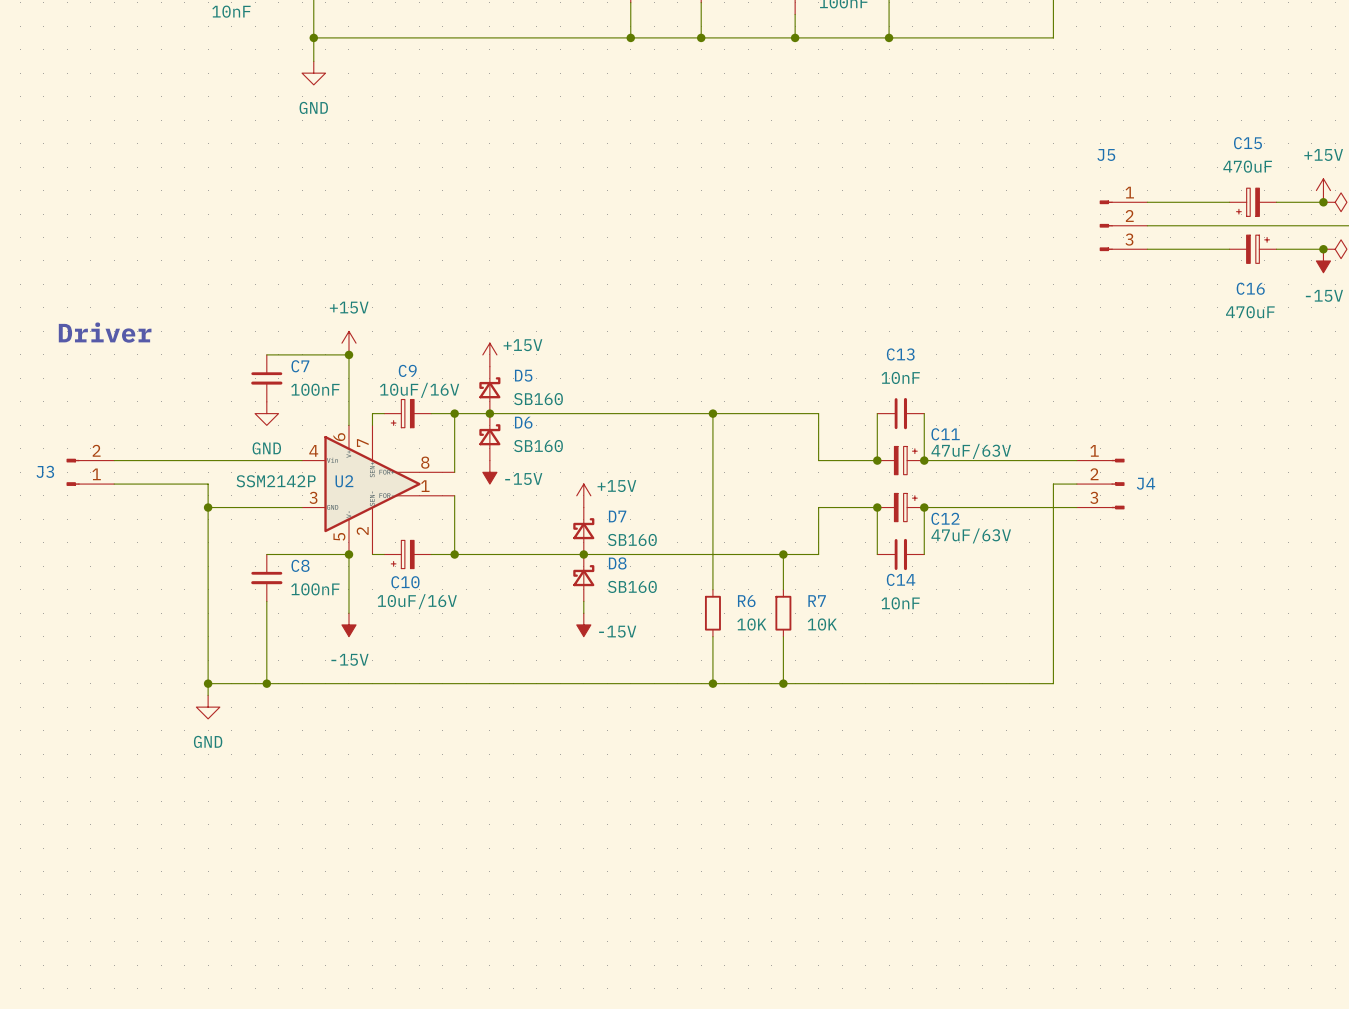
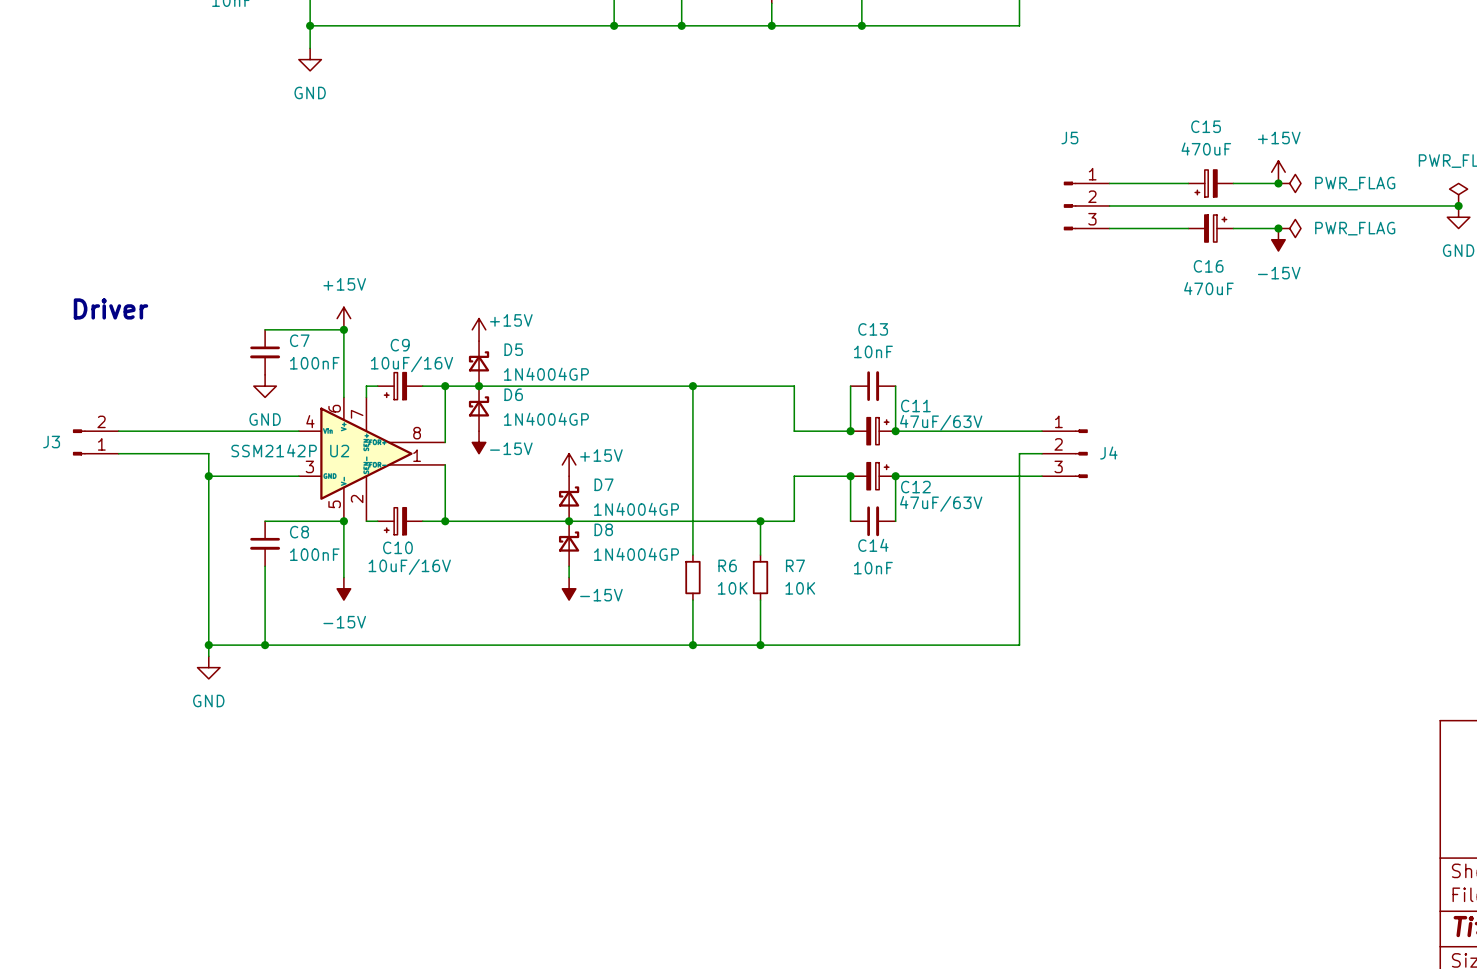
D5 value: SB160 (538, 399) -> 1N4004GP (546, 374)
D6 value: SB160 (538, 446) -> 1N4004GP (546, 419)
D7 value: SB160 (632, 539) -> 1N4004GP (636, 509)
D8 value: SB160 (632, 586) -> 1N4004GP (636, 554)

